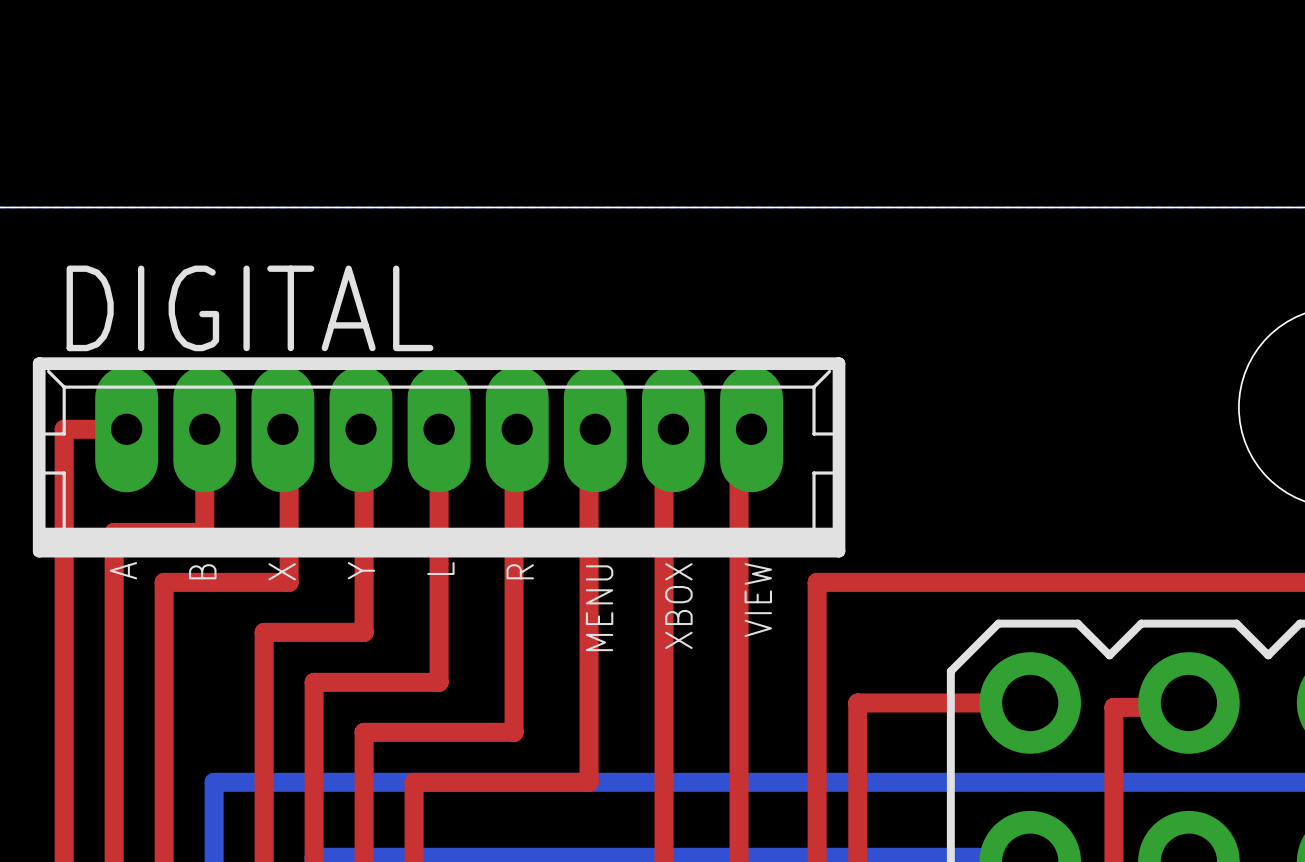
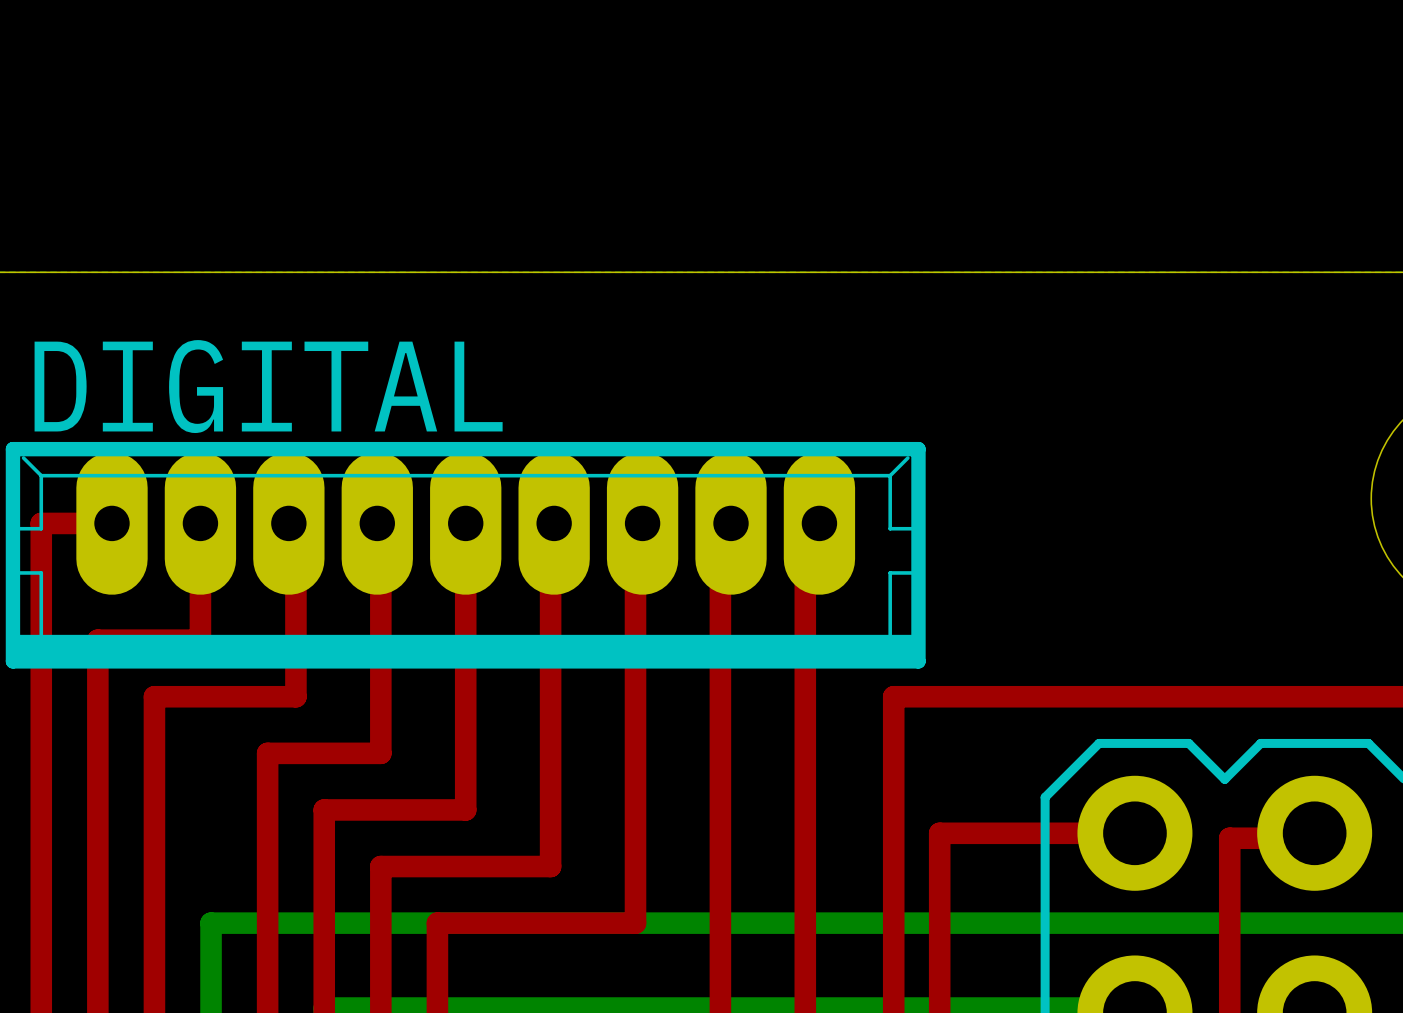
text: L (440, 568) -> none
text: A (123, 570) -> none
text: Y (361, 570) -> none
text: B (202, 571) -> none
text: X (282, 571) -> none
text: R (520, 571) -> none
text: VIEW (758, 600) -> none
text: XBOX (678, 606) -> none
text: MENU (599, 608) -> none

